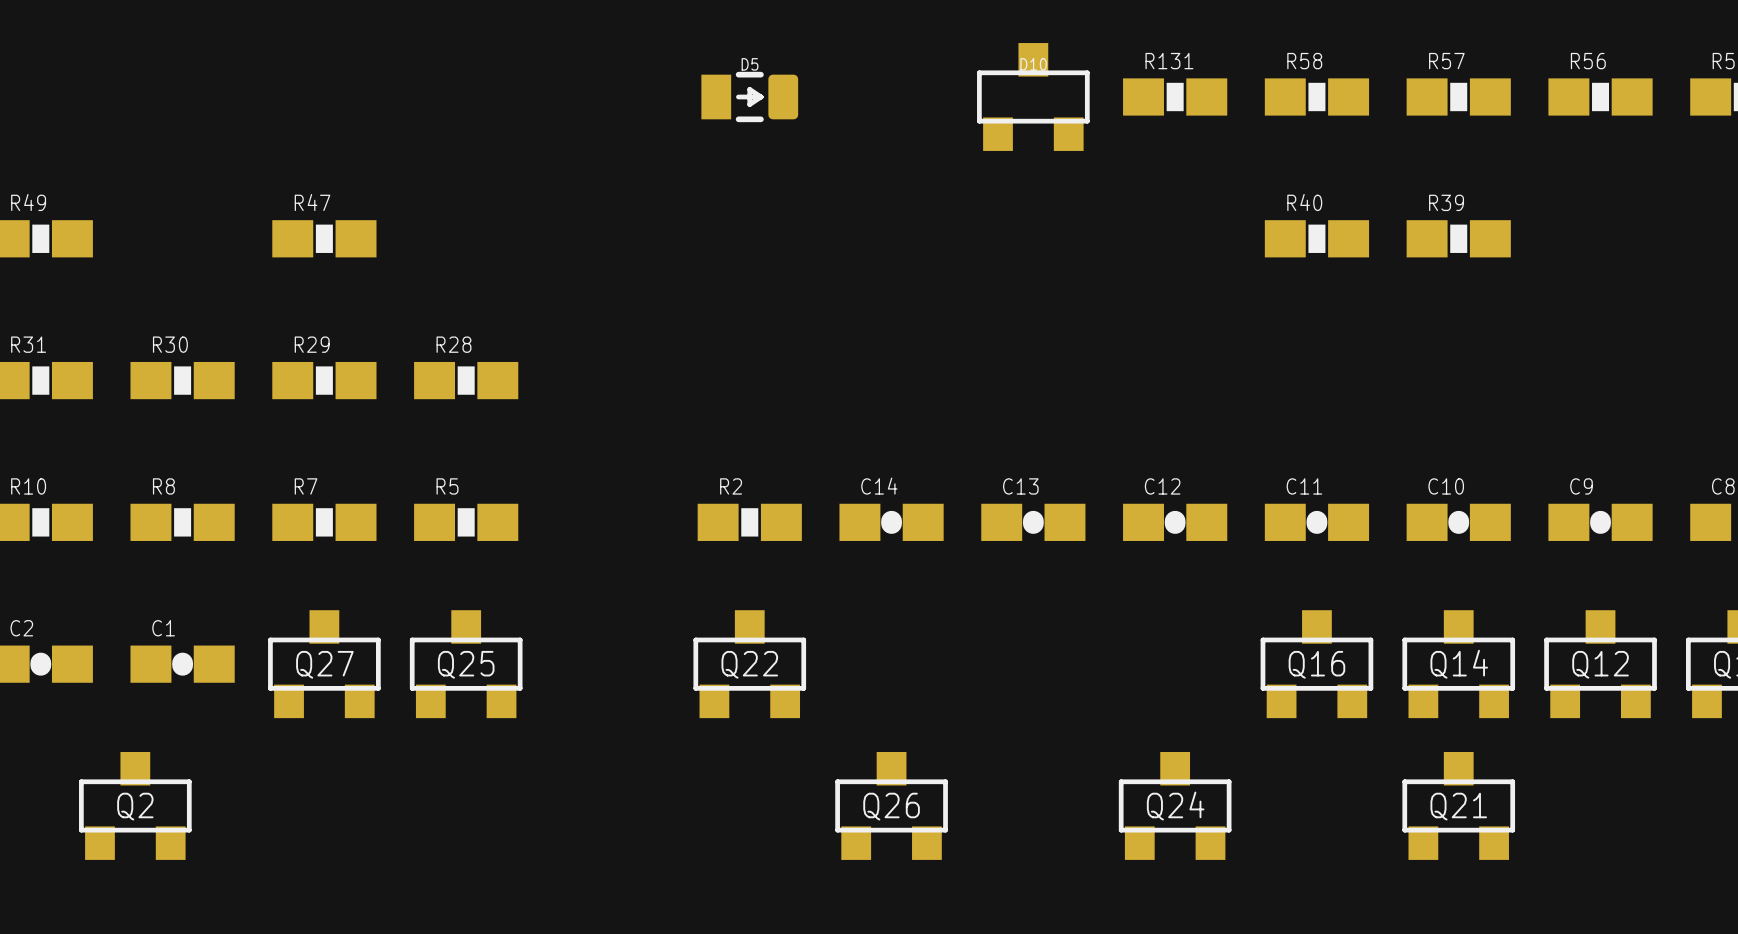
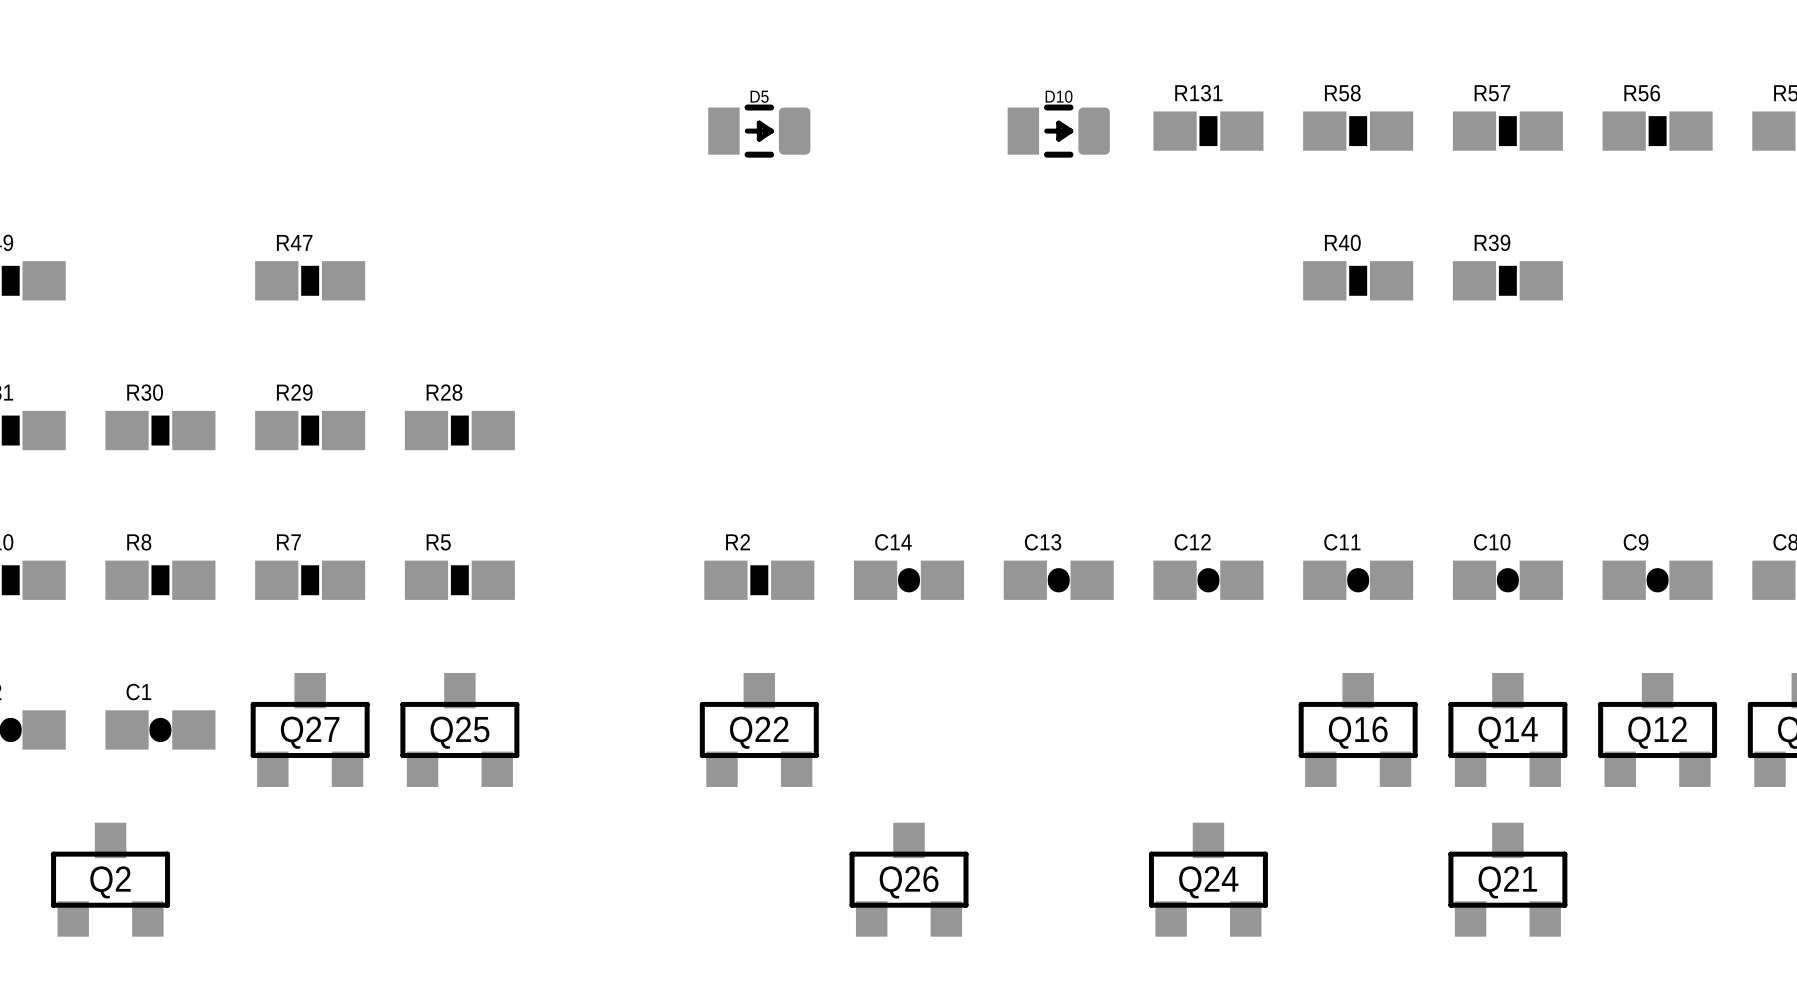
D10 footprint: [977, 43, 1090, 151] -> [1007, 104, 1110, 158]

